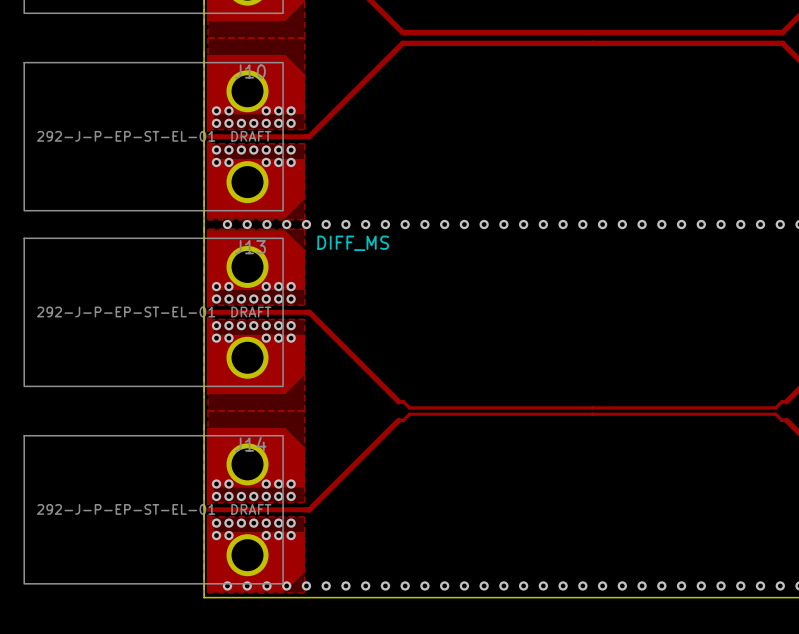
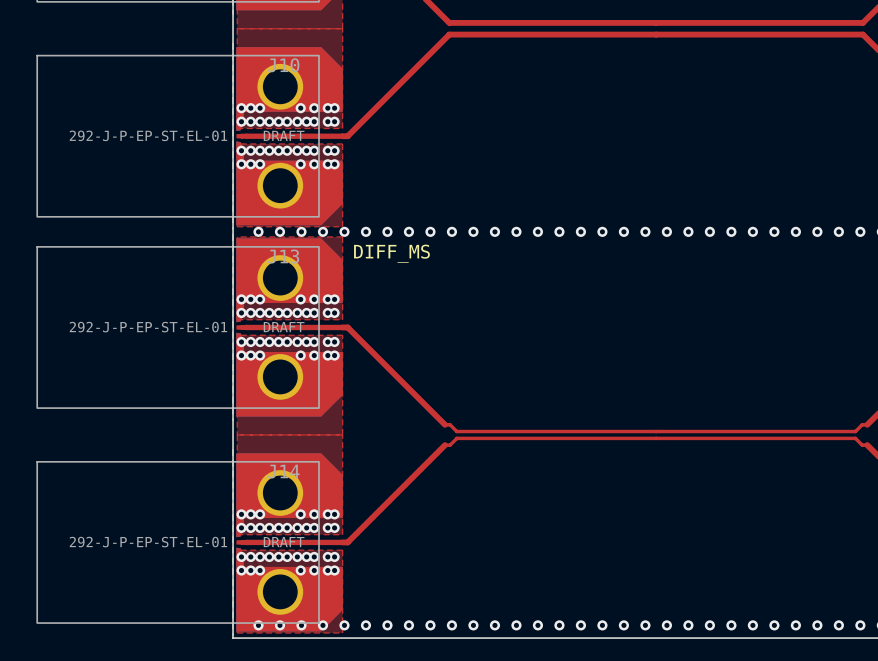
via: none -> (241, 108)
via: (216, 110) -> none
via: none -> (250, 108)
via: none -> (334, 108)
via: none -> (241, 121)
via: (216, 123) -> none
via: none -> (250, 121)
via: none -> (269, 121)
via: (241, 123) -> none
via: none -> (278, 121)
via: none -> (297, 121)
via: (266, 123) -> none
via: none -> (306, 121)
via: none -> (334, 121)
via: none -> (241, 150)
via: (216, 150) -> none
via: none -> (250, 150)
via: none -> (269, 150)
via: (241, 150) -> none
via: none -> (278, 150)
via: none -> (297, 150)
via: (266, 150) -> none
via: none -> (306, 150)
via: none -> (334, 150)
via: none -> (241, 164)
via: (216, 162) -> none
via: none -> (250, 164)
via: none -> (334, 164)
via: none -> (241, 299)
via: (216, 286) -> none
via: none -> (250, 299)
via: none -> (334, 299)
via: none -> (241, 312)
via: (216, 299) -> none
via: none -> (250, 312)
via: none -> (269, 312)
via: (241, 299) -> none
via: none -> (278, 312)
via: none -> (297, 312)
via: (266, 299) -> none
via: none -> (306, 312)
via: none -> (334, 312)
via: none -> (241, 341)
via: (216, 325) -> none
via: none -> (250, 341)
via: none -> (269, 341)
via: (241, 325) -> none
via: none -> (278, 341)
via: none -> (297, 341)
via: (266, 325) -> none
via: none -> (306, 341)
via: none -> (334, 341)
via: none -> (241, 355)
via: (216, 338) -> none
via: none -> (250, 355)
via: none -> (334, 355)
via: none -> (241, 514)
via: (216, 484) -> none
via: none -> (250, 514)
via: none -> (334, 514)
via: none -> (241, 527)
via: (216, 496) -> none
via: none -> (250, 527)
via: none -> (269, 527)
via: (241, 496) -> none
via: none -> (278, 527)
via: none -> (297, 527)
via: (266, 496) -> none
via: none -> (306, 527)
via: none -> (334, 527)
via: none -> (241, 556)
via: (216, 523) -> none
via: none -> (250, 556)
via: none -> (269, 556)
via: (241, 523) -> none
via: none -> (278, 556)
via: none -> (297, 556)
via: (266, 523) -> none
via: none -> (306, 556)
via: none -> (334, 556)
via: none -> (241, 570)
via: (216, 535) -> none
via: none -> (250, 570)
via: none -> (334, 570)

